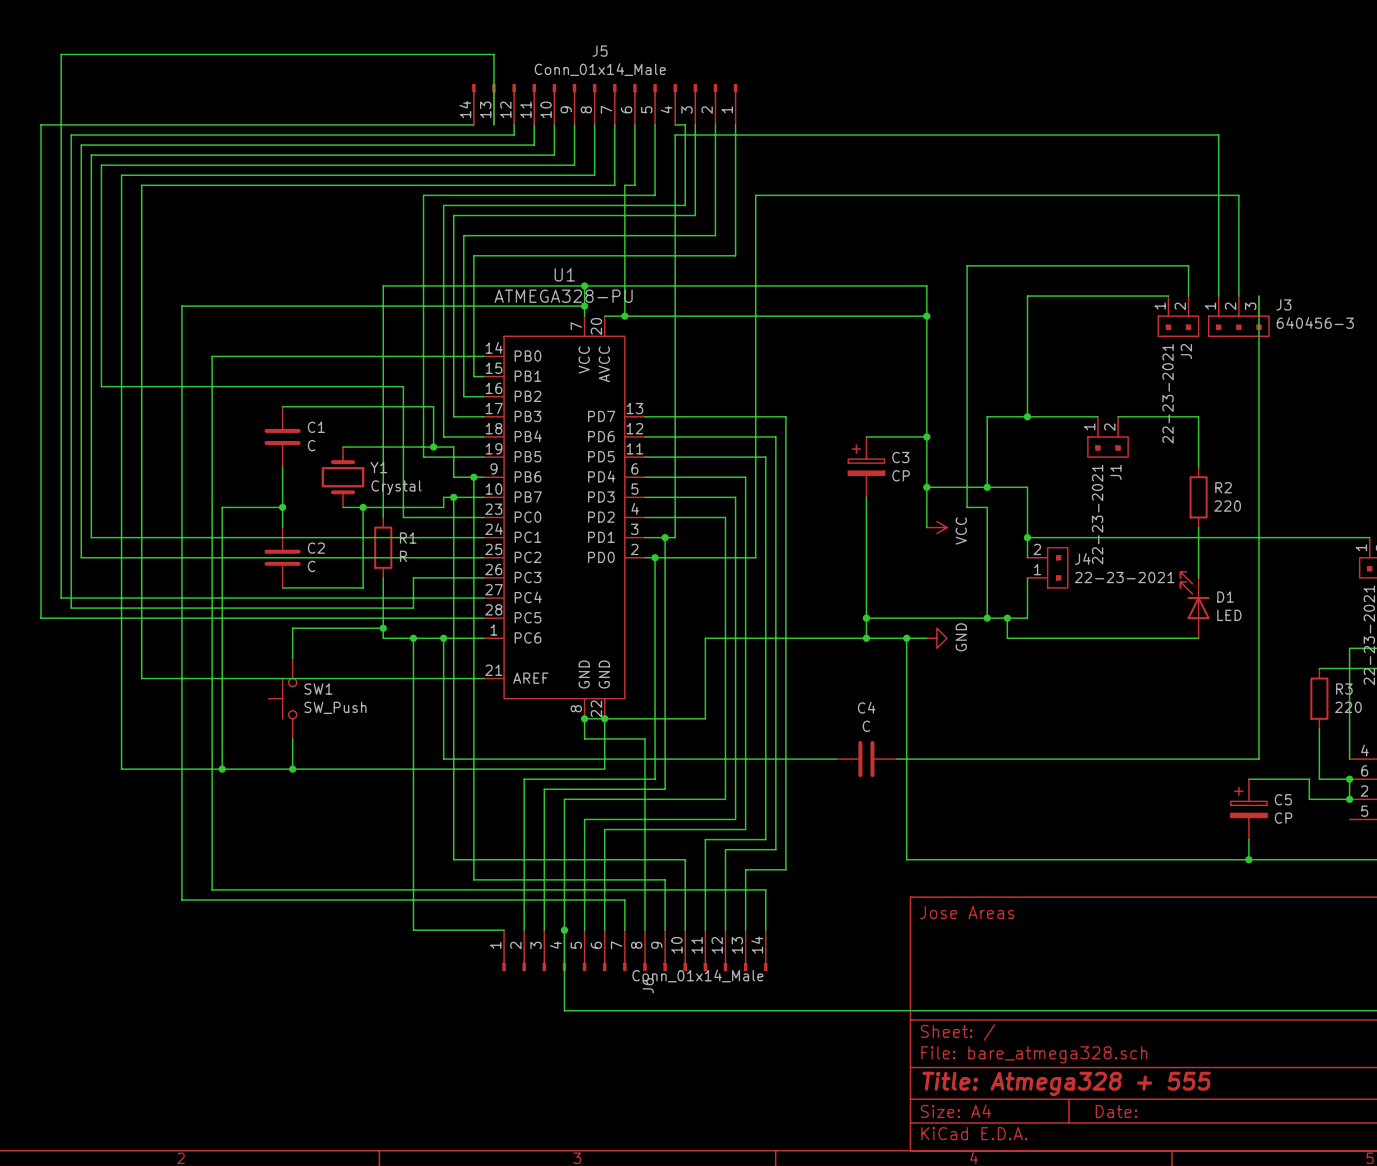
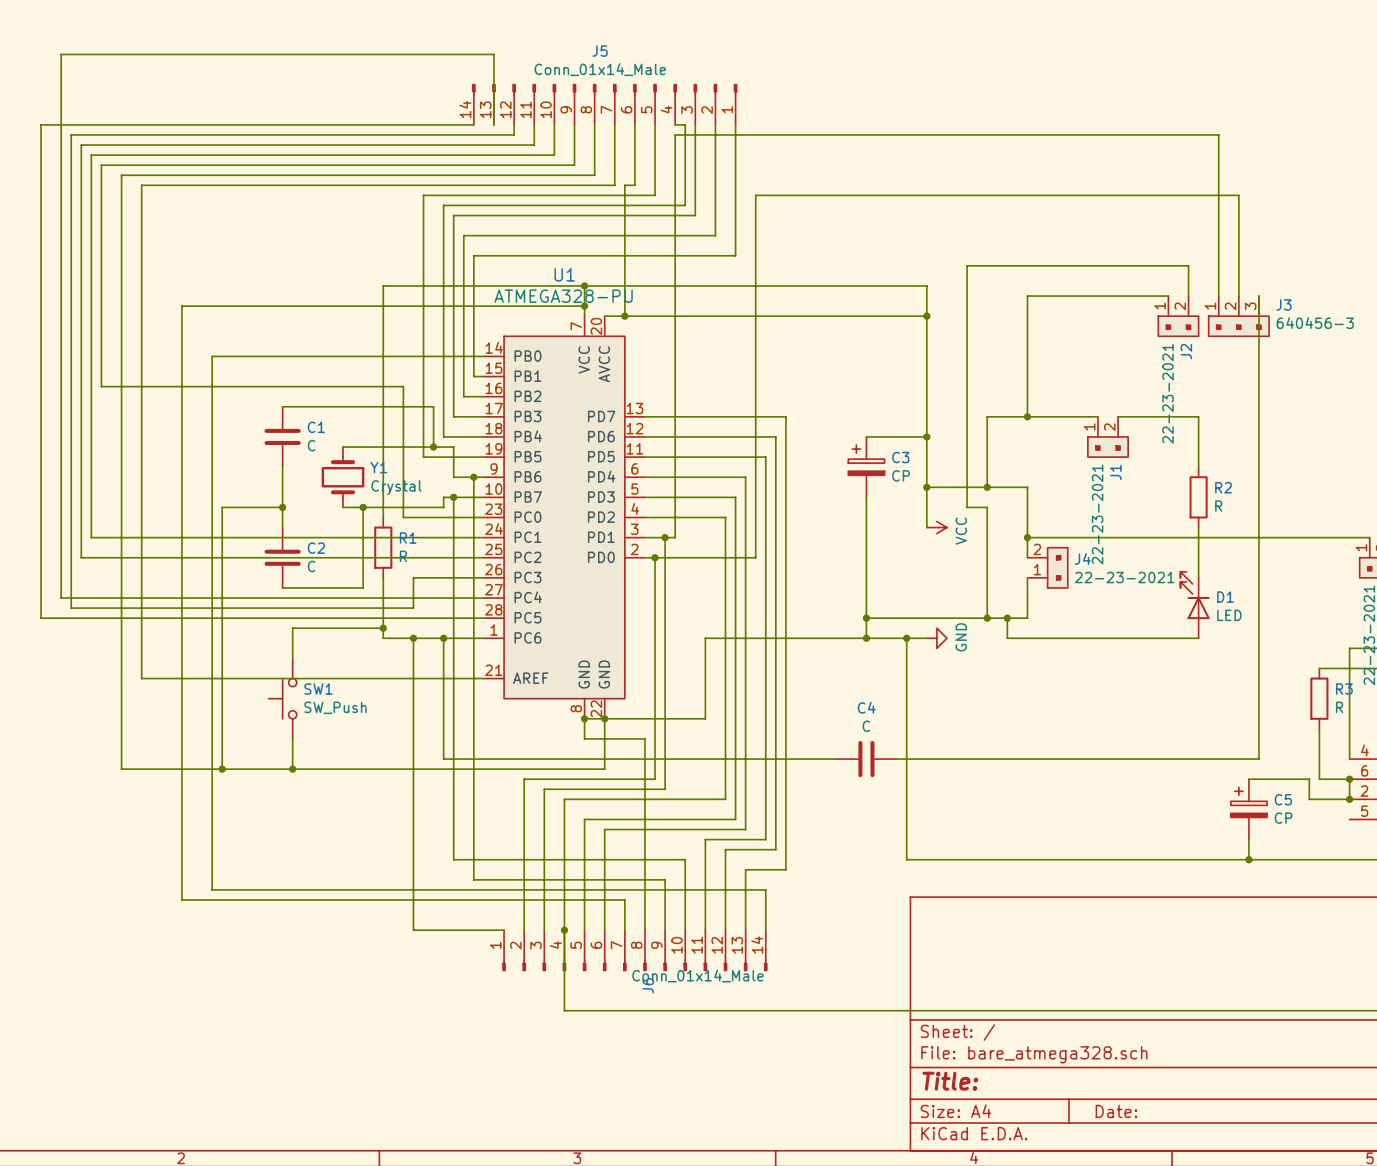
R2 value: 220 (1227, 506) -> R (1218, 506)
R3 value: 220 (1348, 707) -> R (1339, 707)
title block: Jose Areas (967, 912) -> none
title block: Title: Atmega328 + 555 (1066, 1083) -> Title: (950, 1081)

